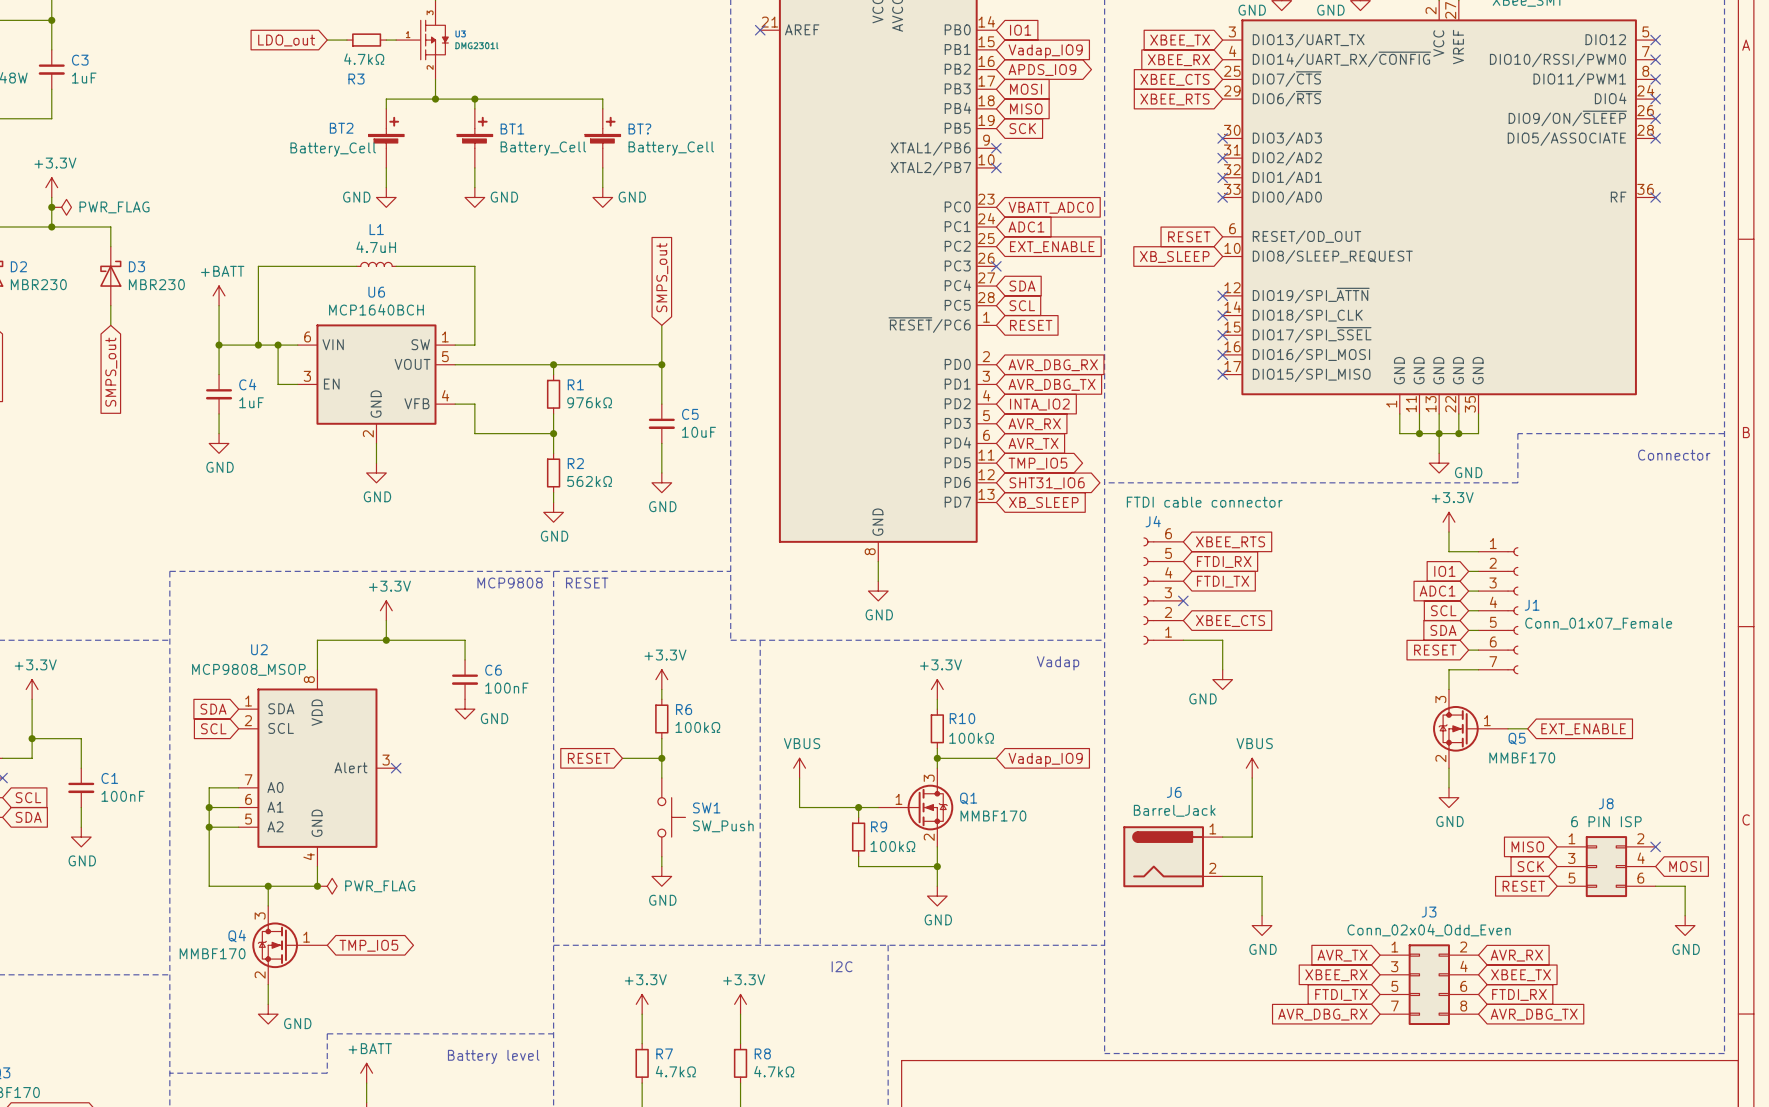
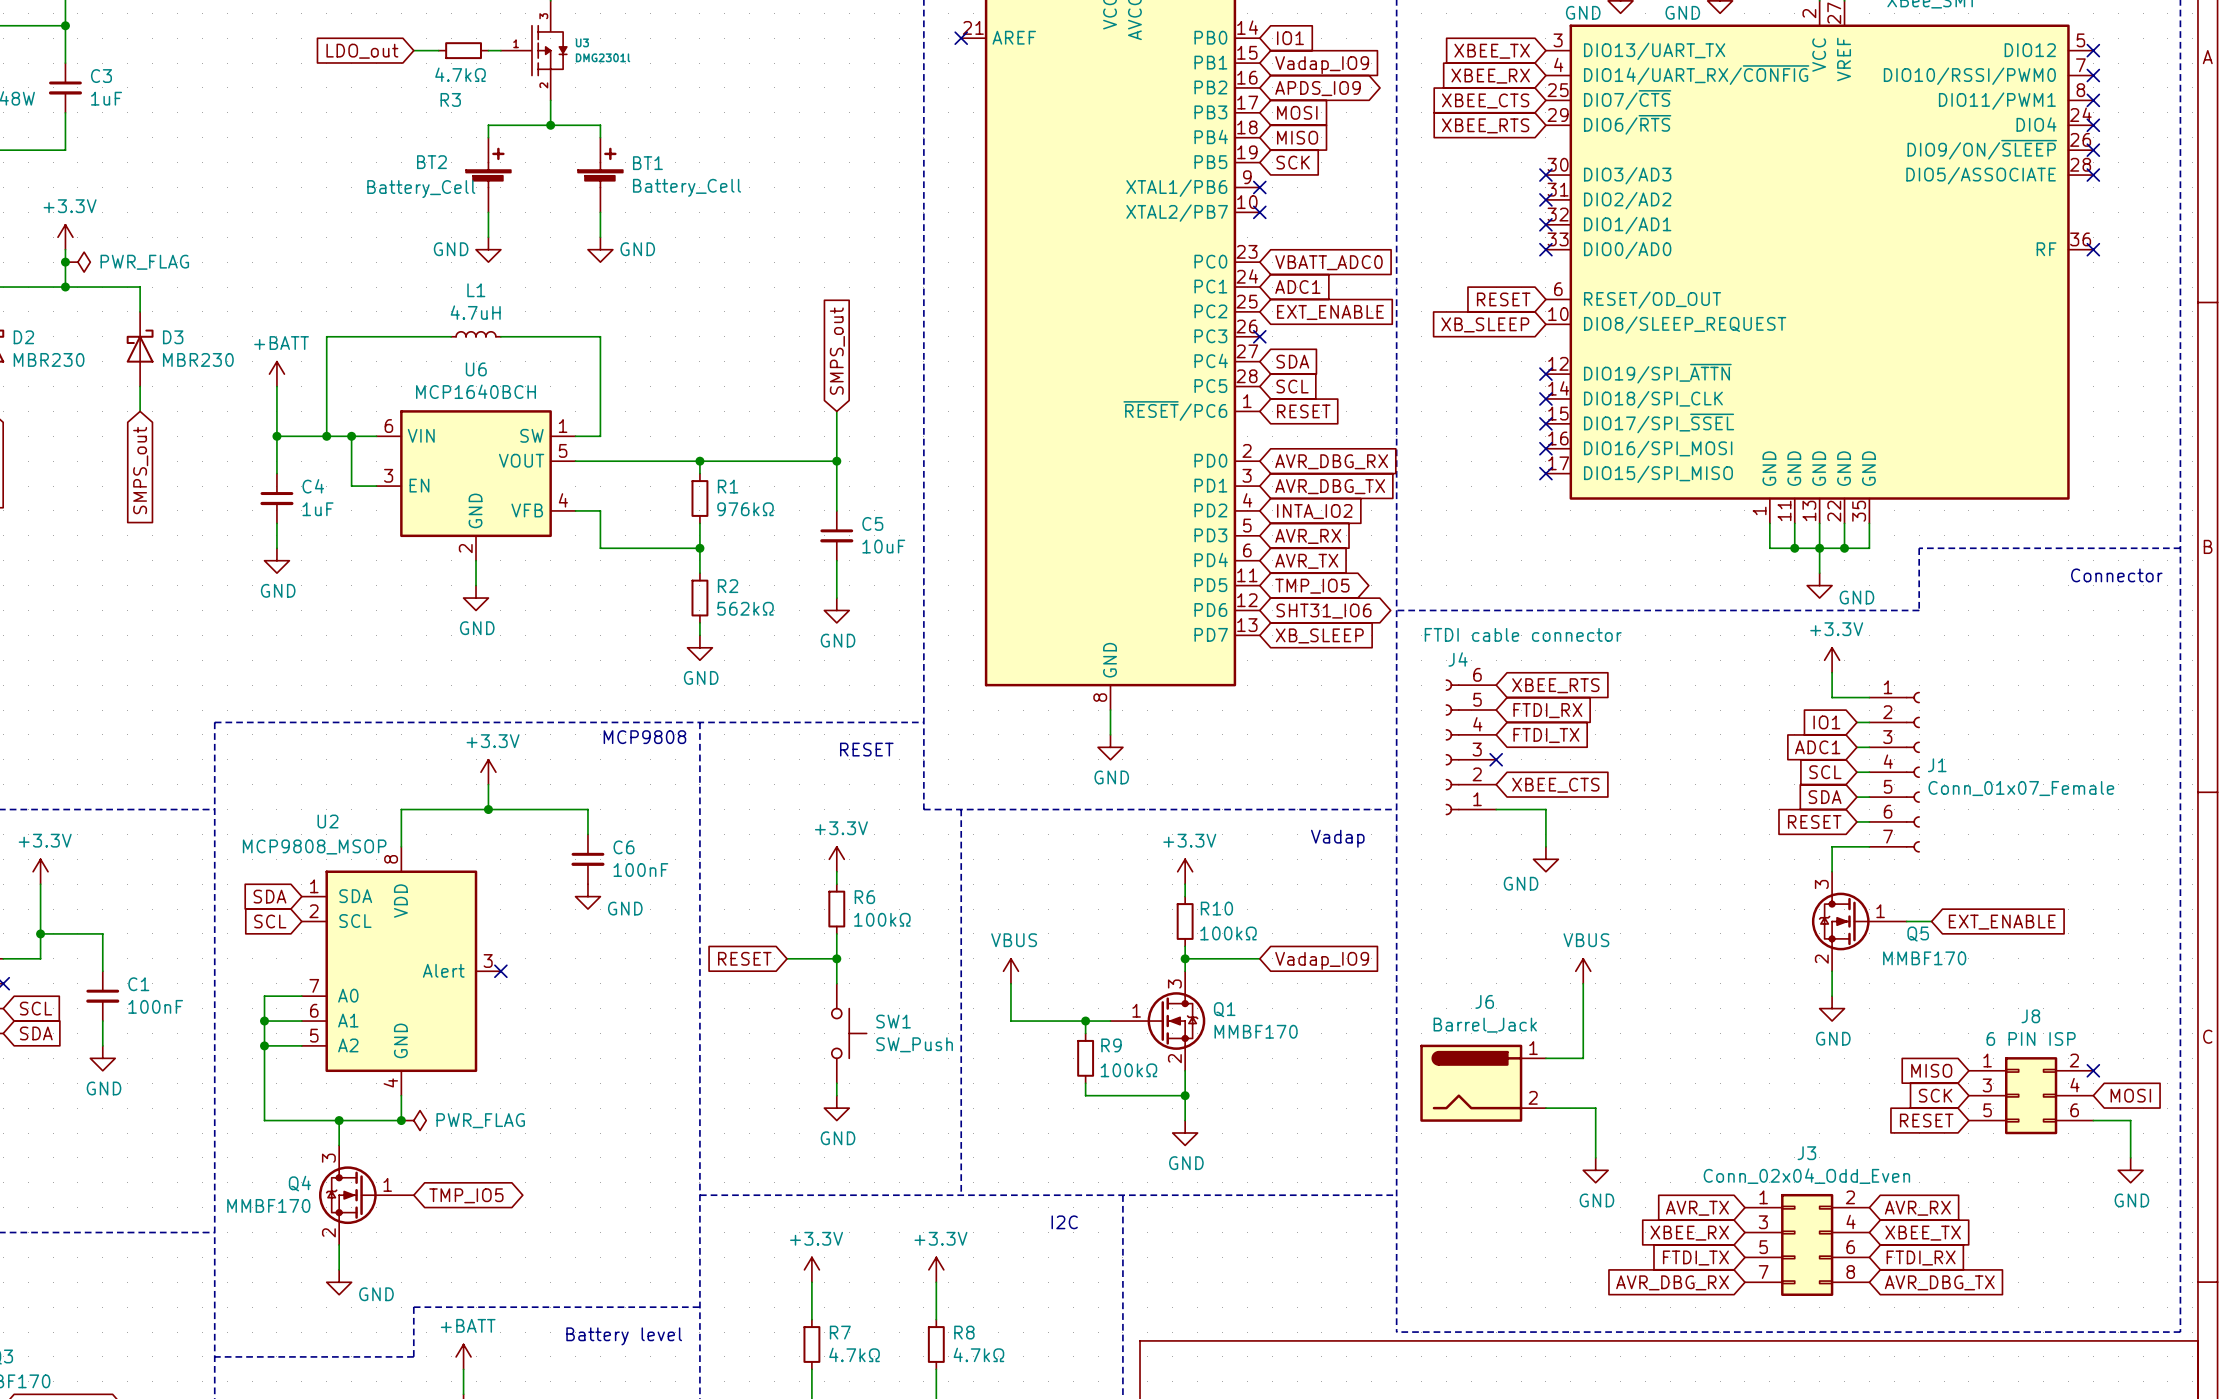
wire: (474, 99) (602, 99) (602, 108) -> none
junction: (474, 99) -> none
BT?: Battery_Cell (602, 138) -> none
wire: (602, 167) (602, 187) -> none
power symbol: GND (602, 197) -> none
text position: RESET (587, 583) -> RESET (866, 749)

